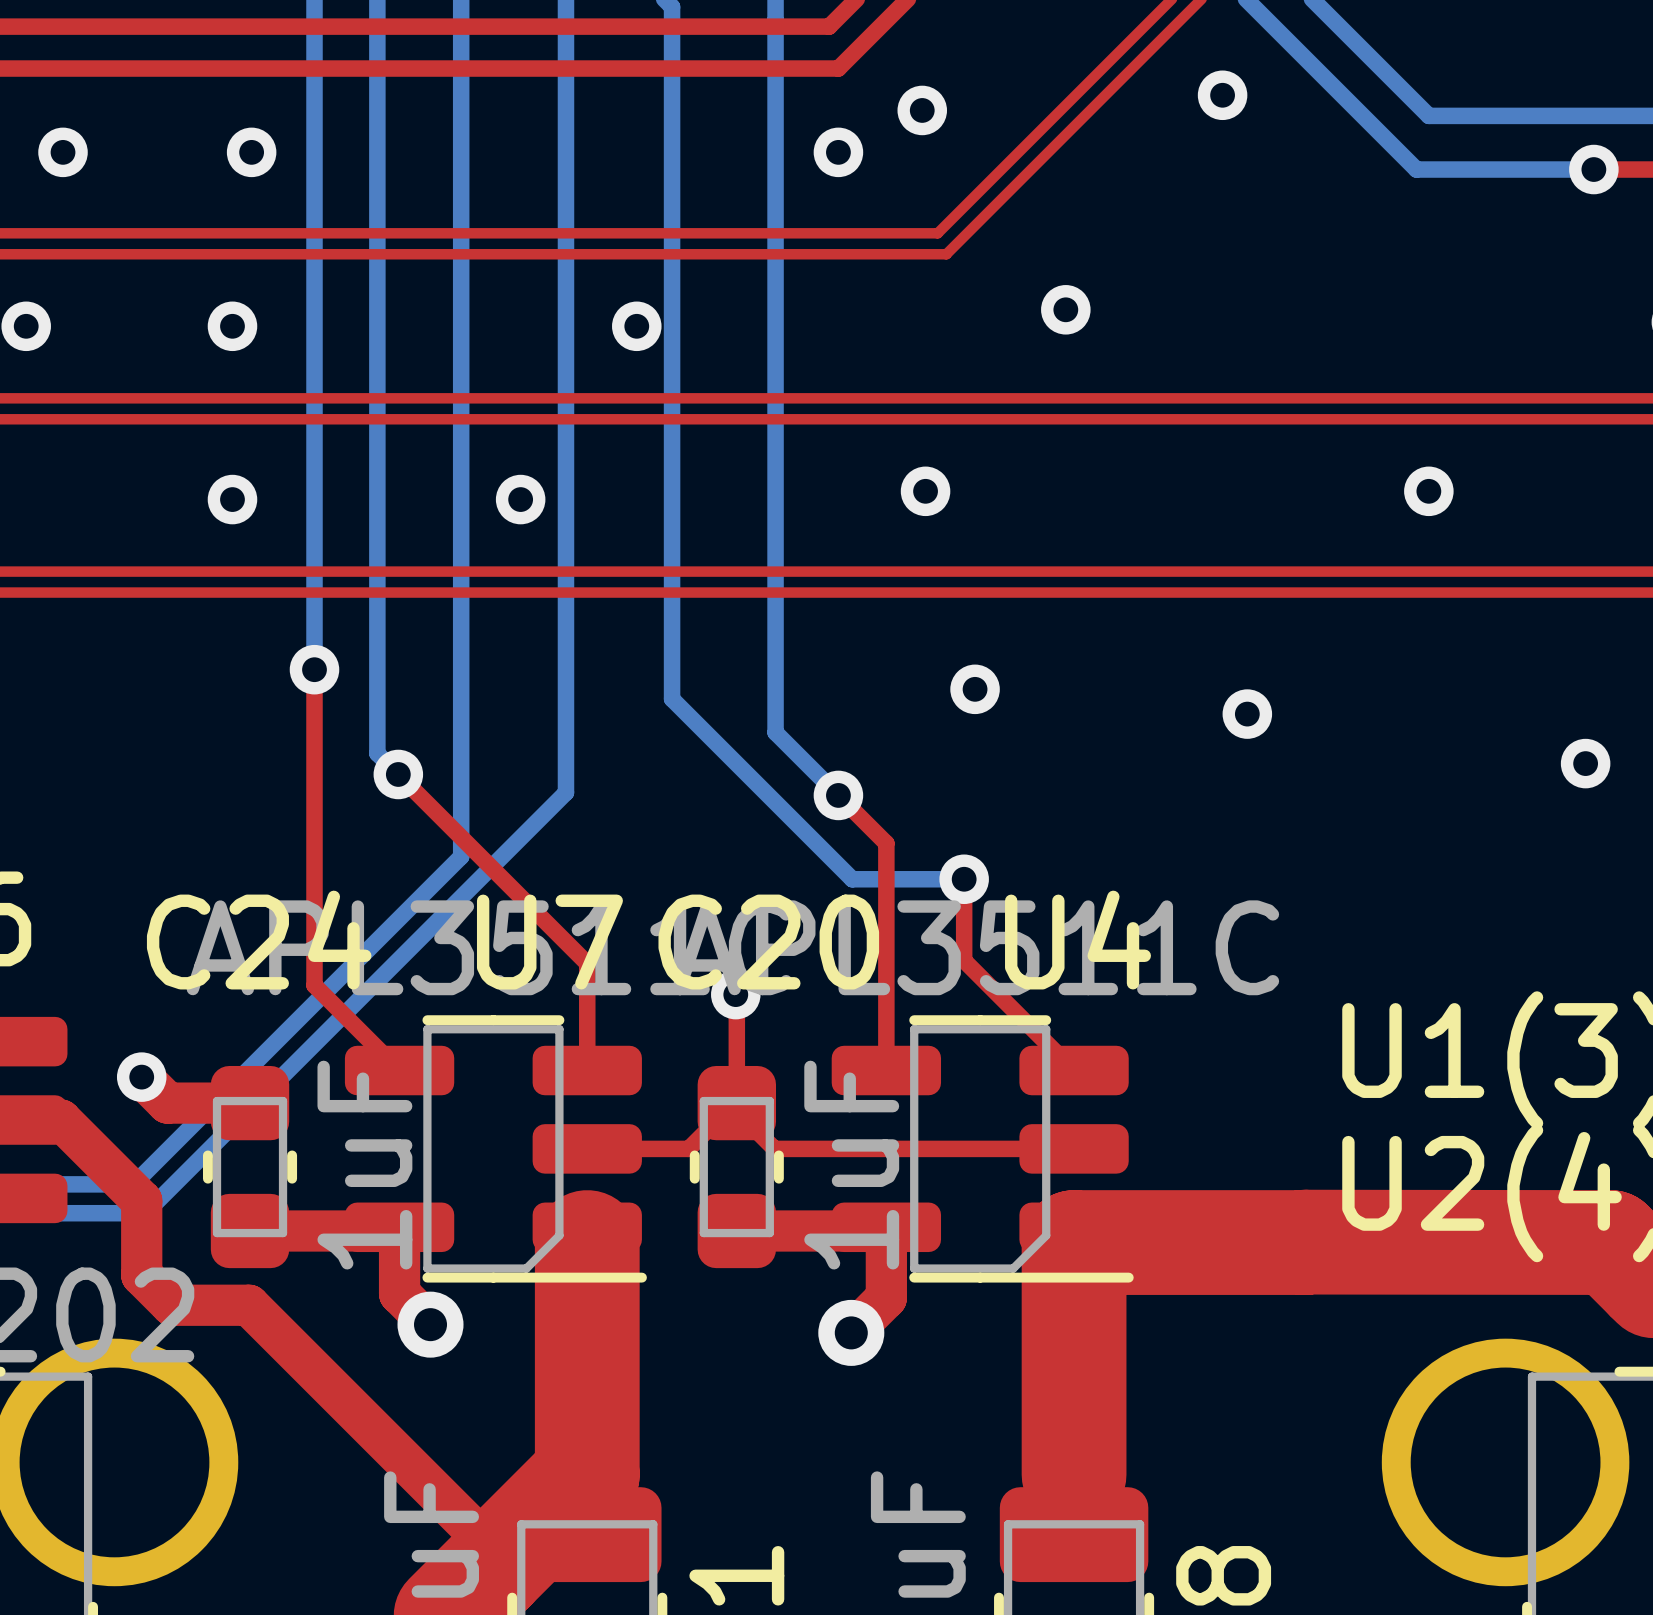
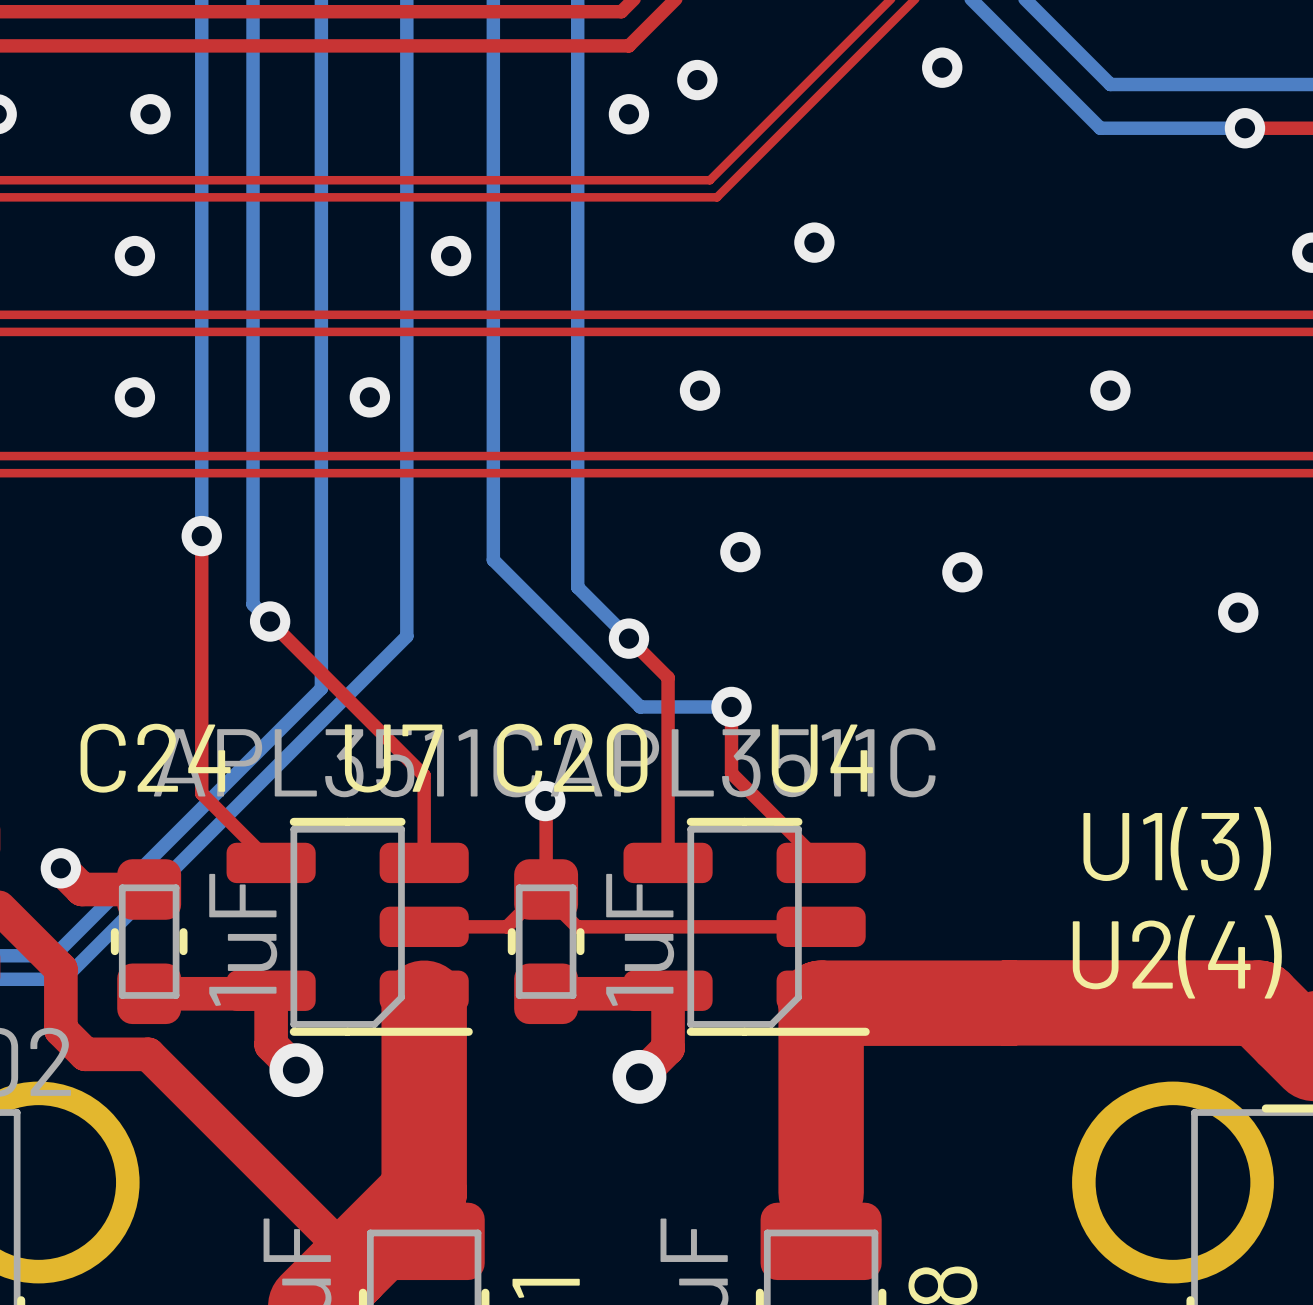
via position: (636, 326) -> (451, 256)

